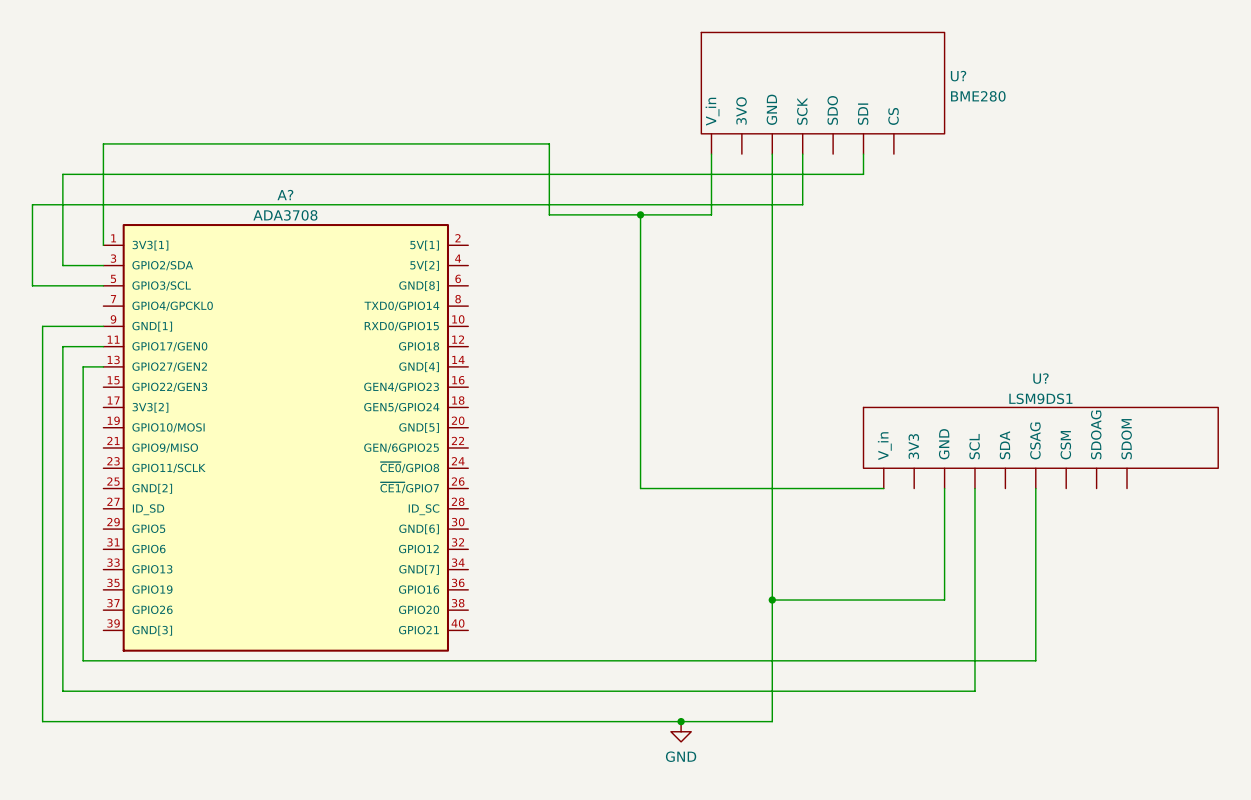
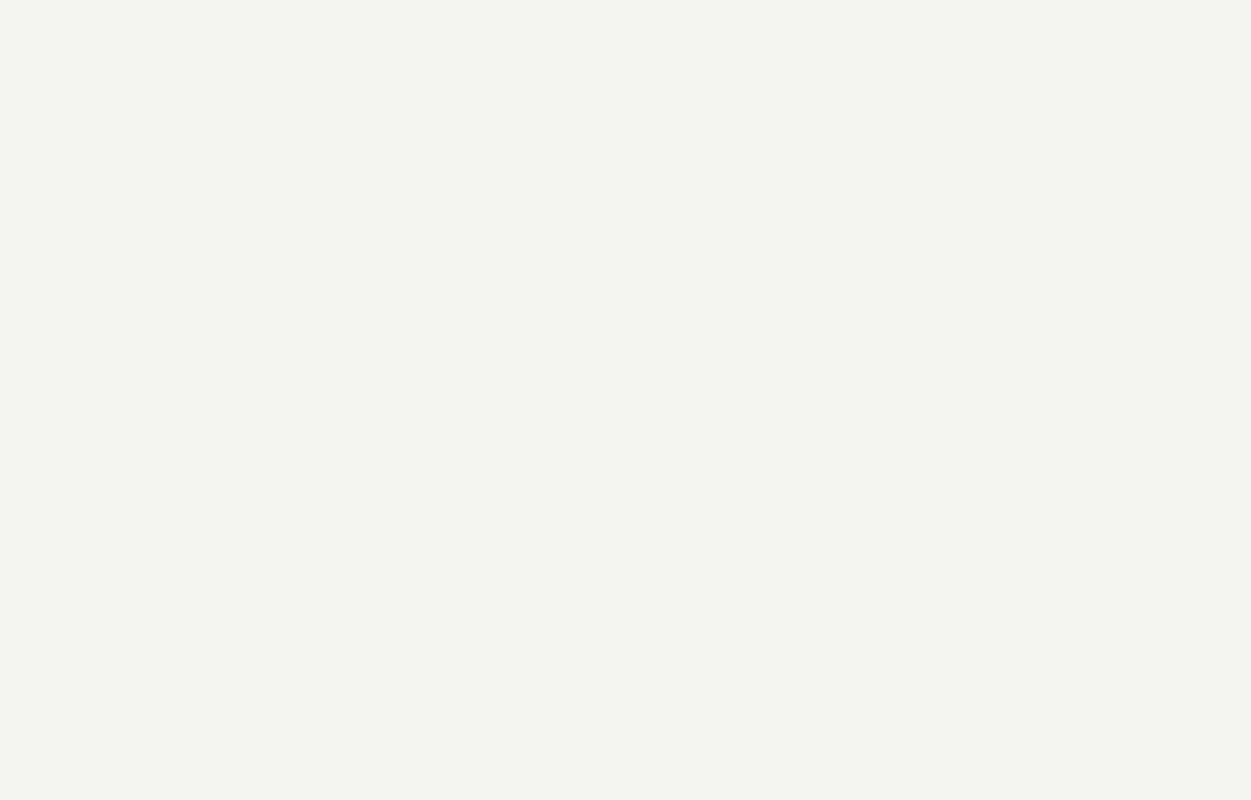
U?: BME280 (822, 93) -> none
wire: (711, 154) (711, 214) (549, 214) (549, 143) (103, 143) (103, 245) -> none
wire: (772, 154) (772, 721) (42, 721) (42, 326) (103, 326) -> none
wire: (802, 154) (802, 204) (32, 204) (32, 285) (103, 285) -> none
wire: (863, 154) (863, 174) (62, 174) (62, 265) (103, 265) -> none
wire: (640, 214) (640, 488) (883, 488) -> none
junction: (640, 214) -> none
wire: (103, 346) (62, 346) (62, 691) (974, 691) (974, 488) -> none
wire: (103, 366) (83, 366) (83, 660) (1035, 660) (1035, 488) -> none
A?: ADA3708 (285, 437) -> none
U?: LSM9DS1 (1040, 447) -> none
wire: (944, 488) (944, 600) (772, 600) -> none
junction: (772, 600) -> none
junction: (681, 721) -> none
power symbol: GND (681, 731) -> none

